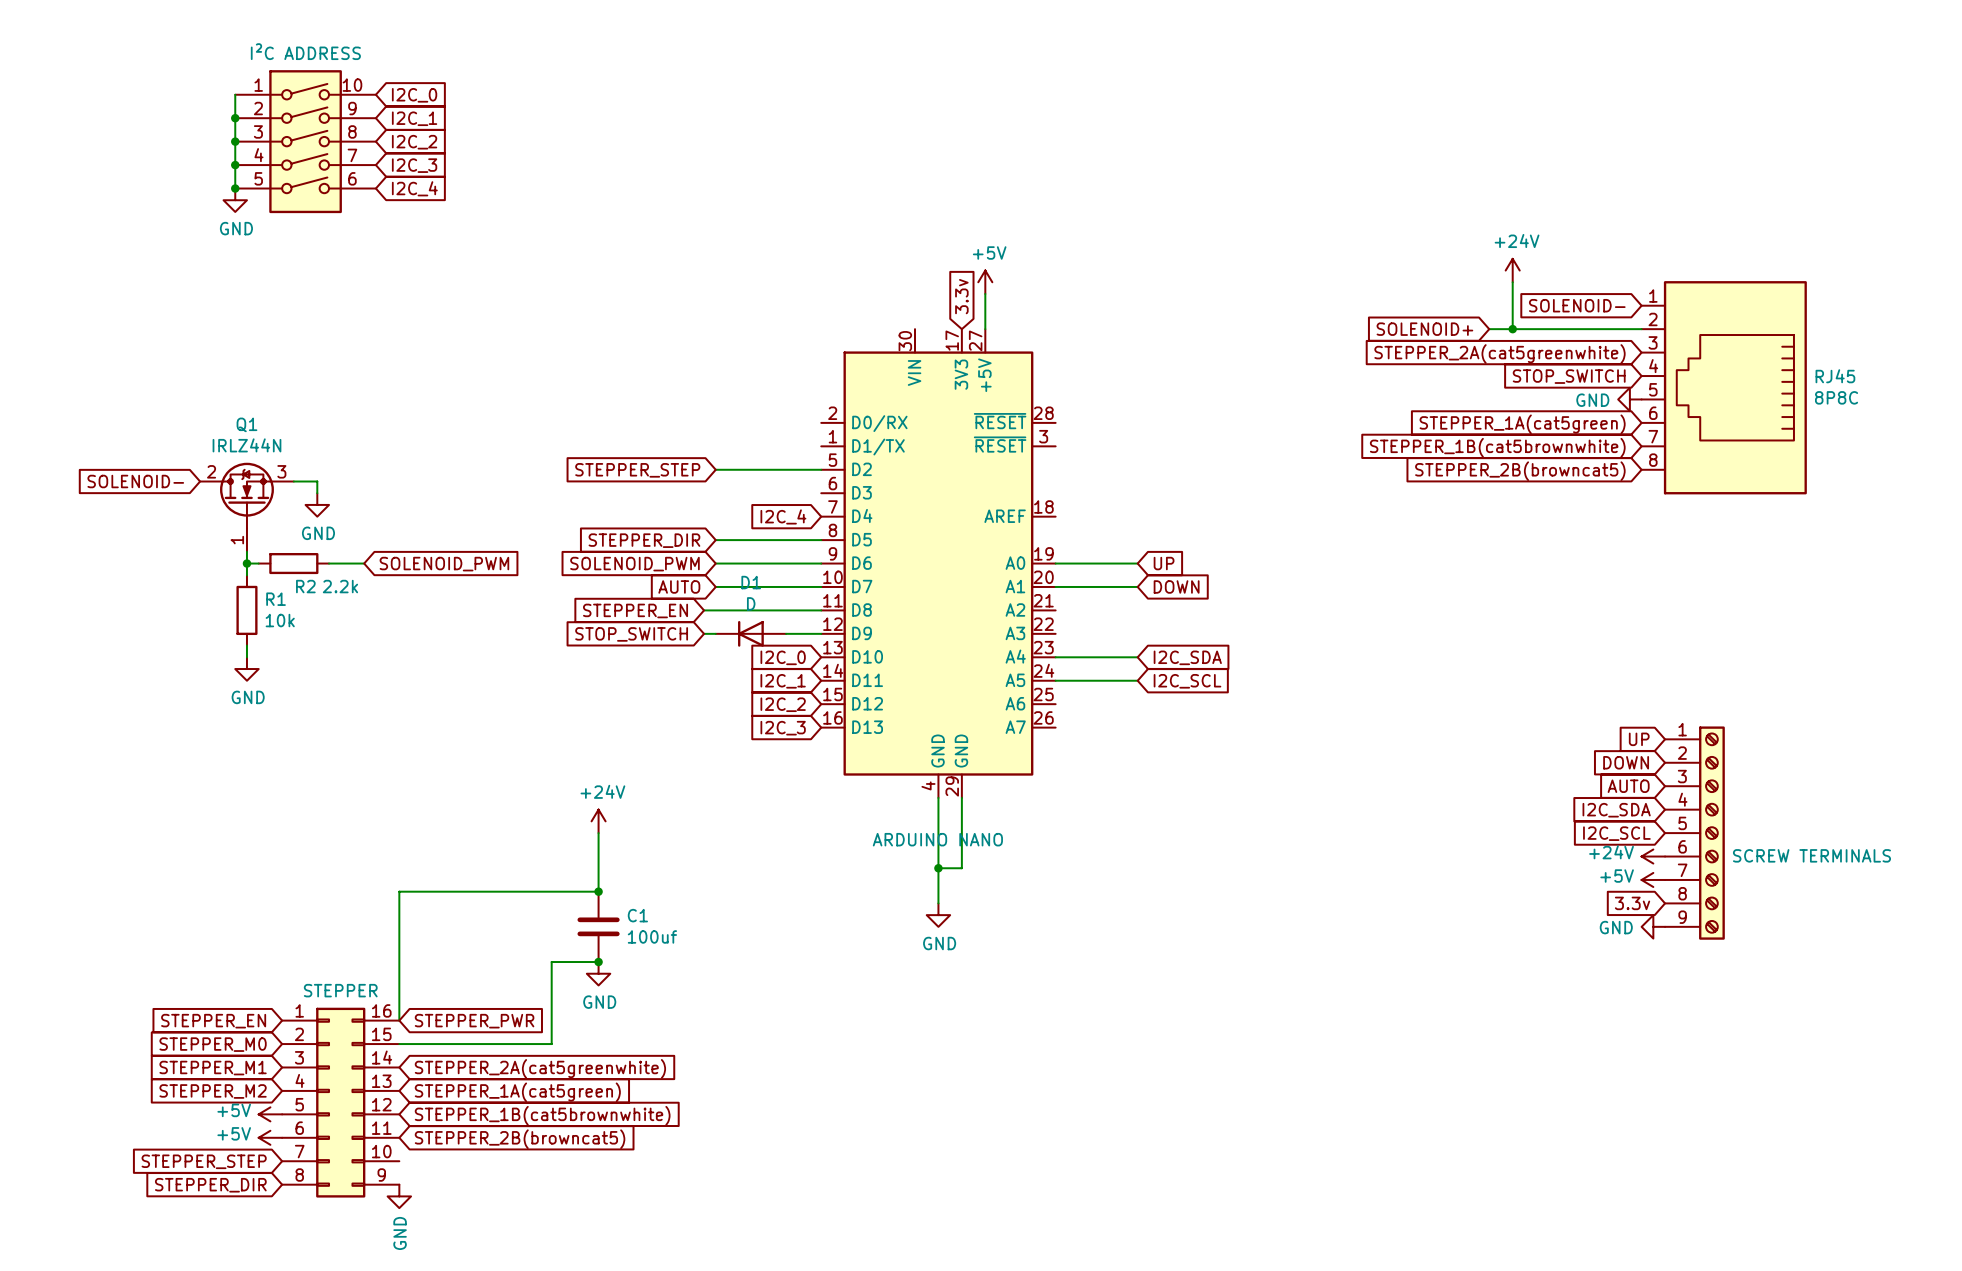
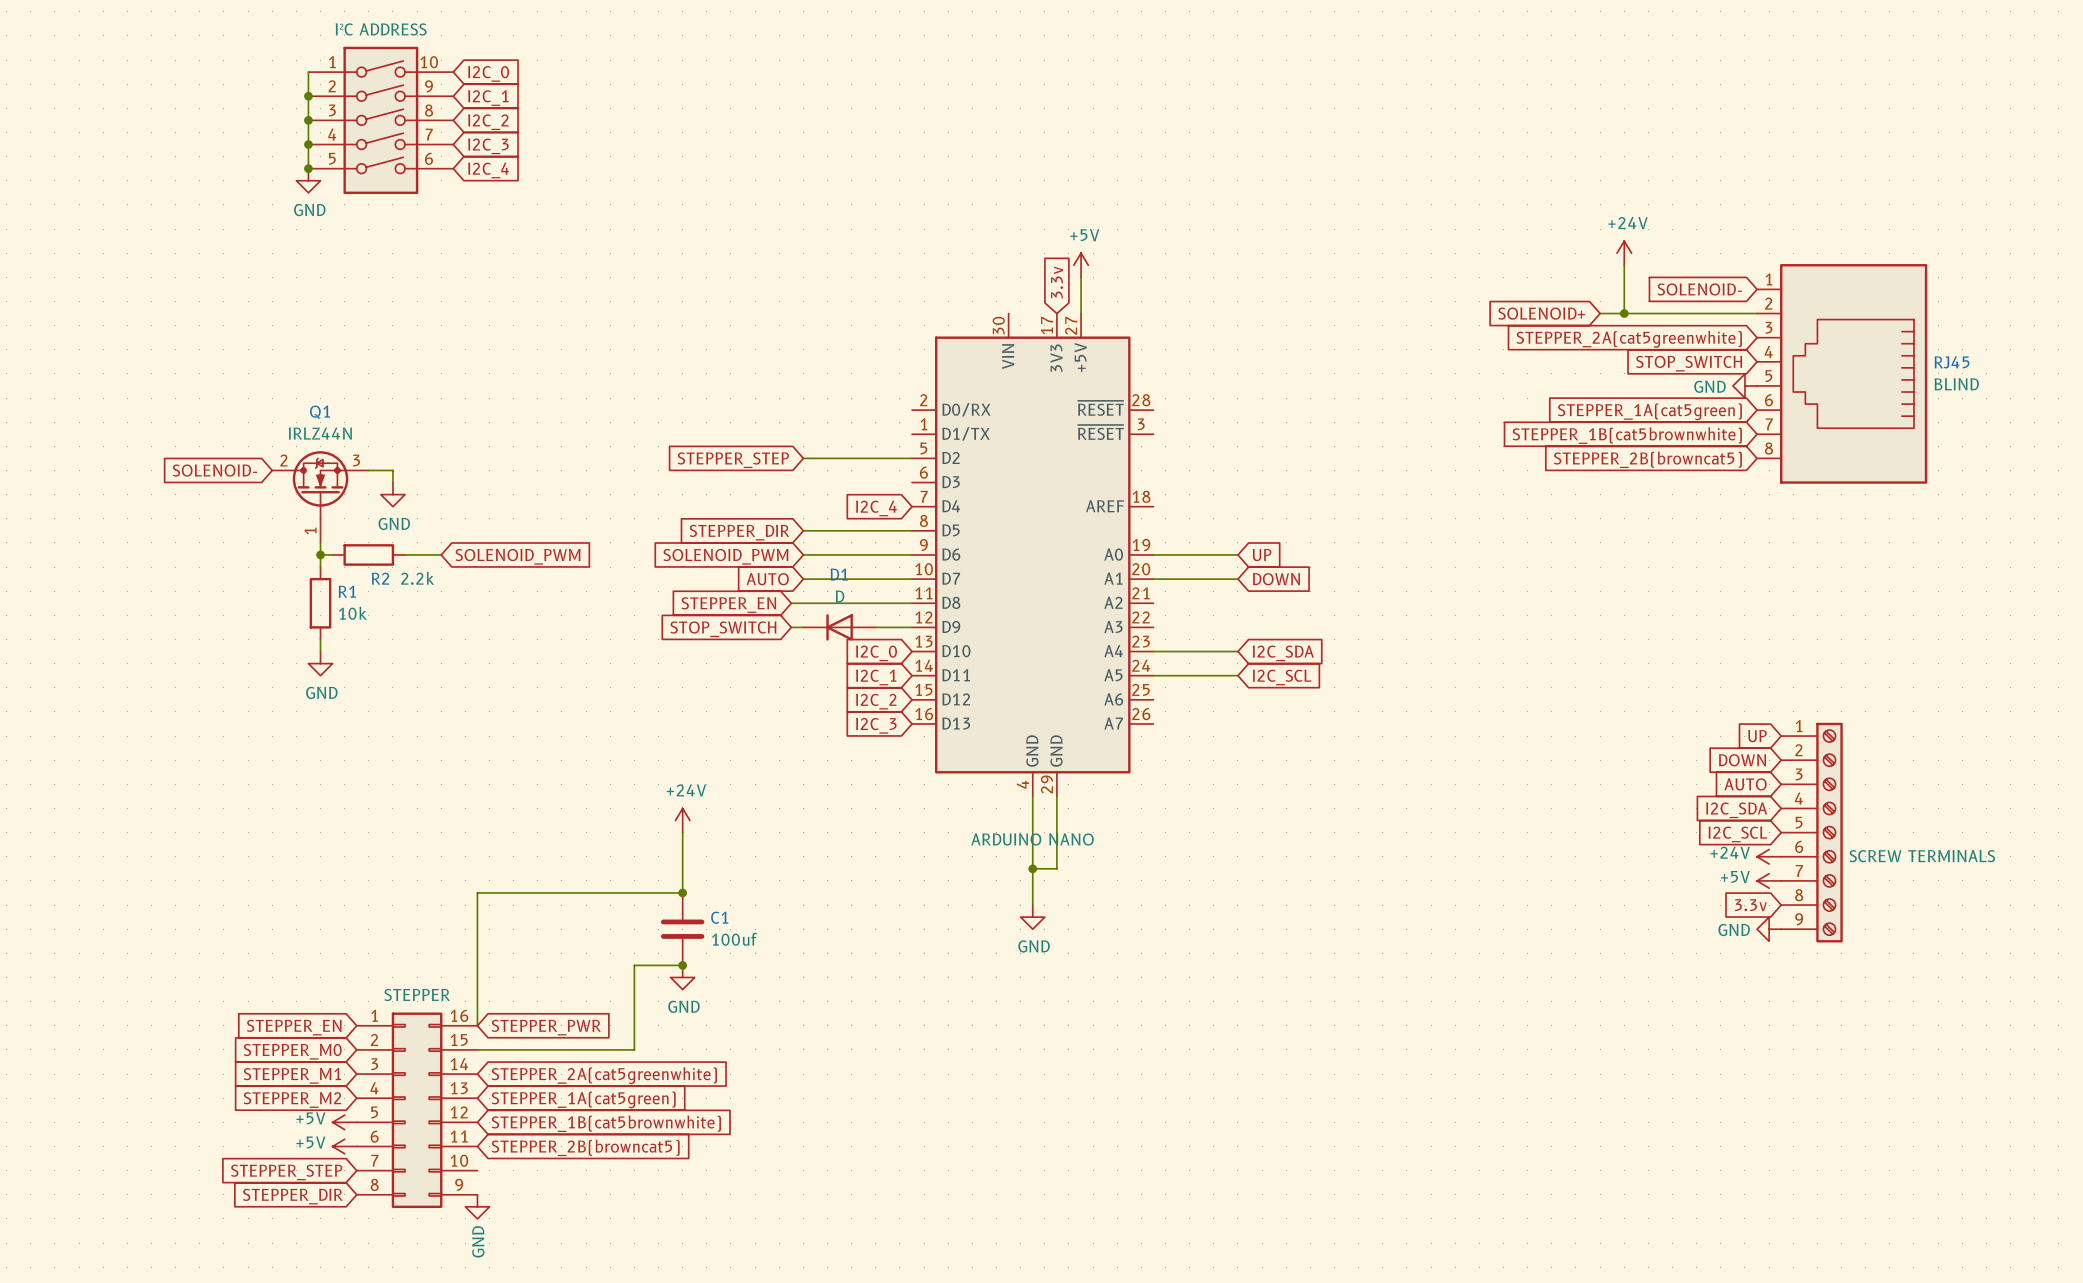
RJ45 value: 8P8C (1836, 397) -> BLIND (1956, 384)

